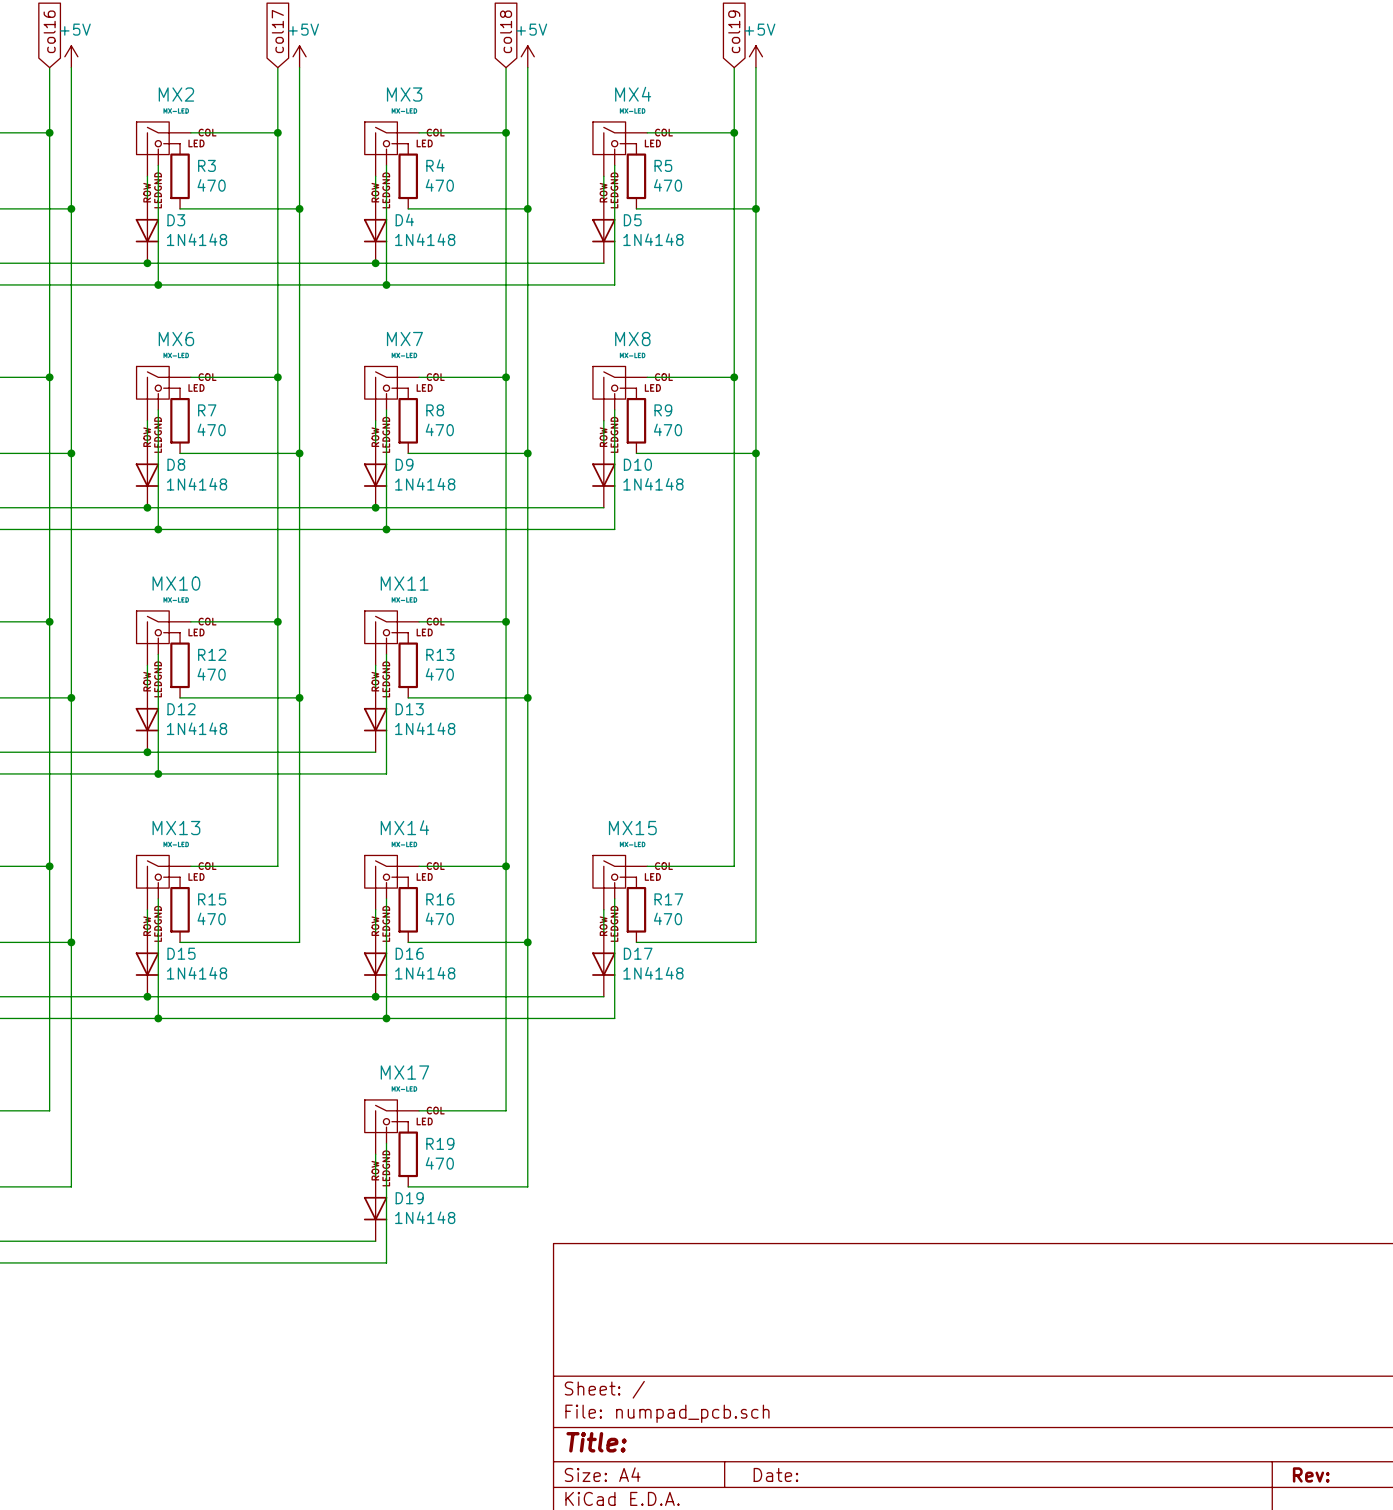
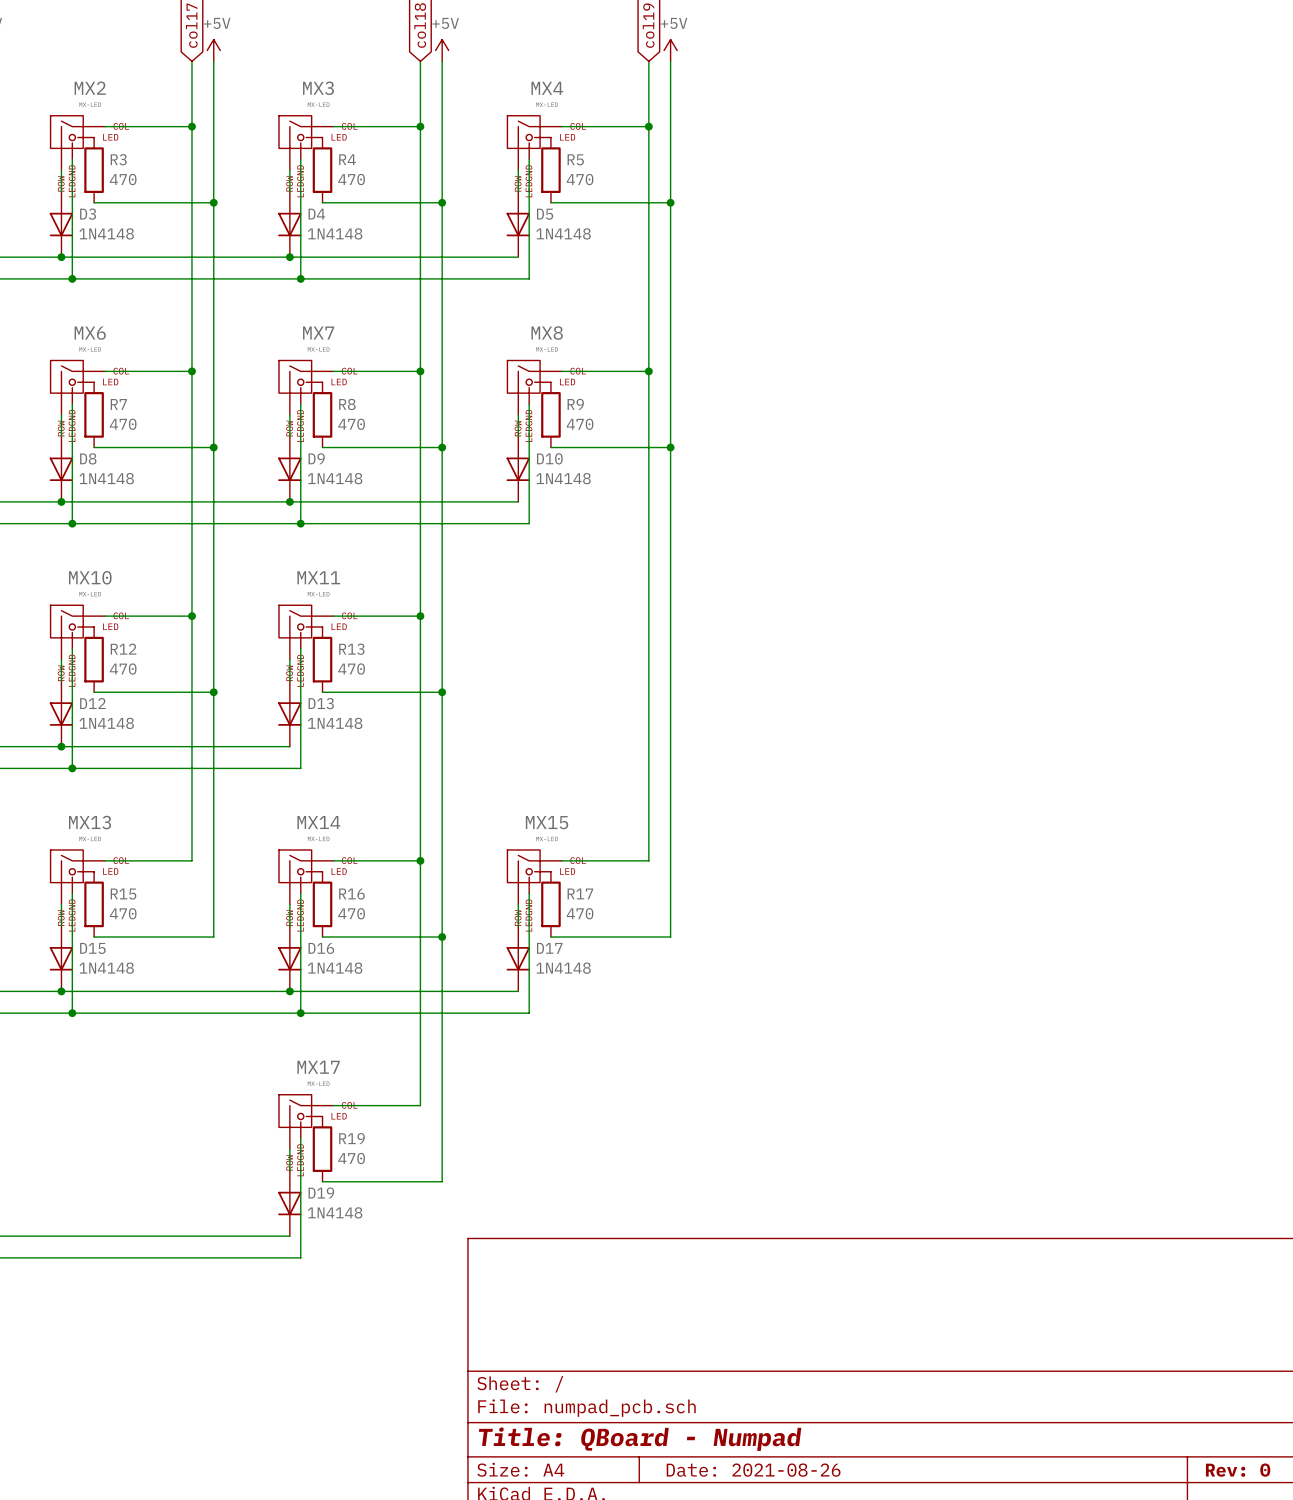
title block: Title: (596, 1442) -> Title: QBoard - Numpad (640, 1439)
title block: Date: (775, 1474) -> Date: 2021-08-26 (753, 1470)
title block: Rev: (1311, 1474) -> Rev: 0 (1238, 1470)

